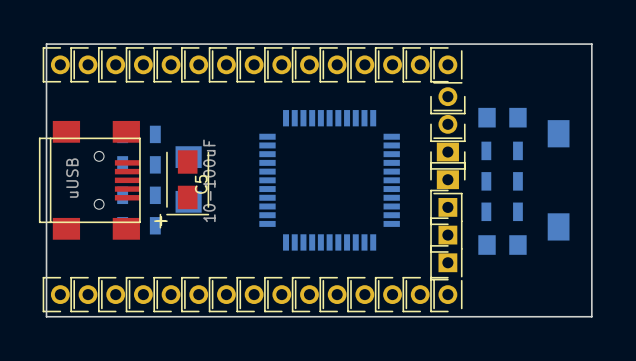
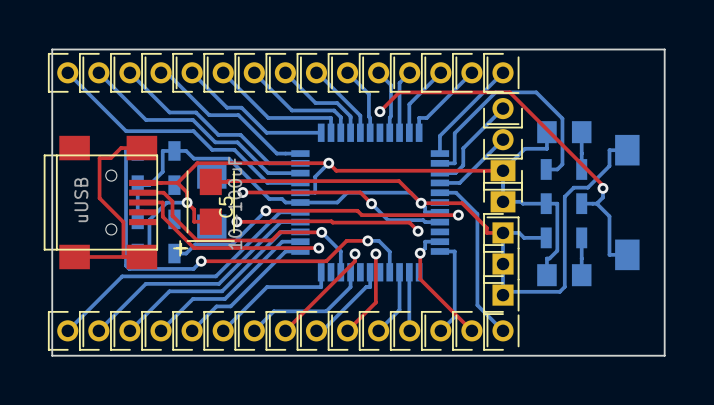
bottom track: none -> (67, 72) (126, 131) (193, 131) (212, 149) (234, 149) (267, 182) (300, 182)
bottom track: none -> (98, 72) (146, 119) (192, 119) (215, 142) (237, 142) (268, 173) (300, 173)
bottom track: none -> (129, 72) (169, 112) (196, 112) (218, 134) (240, 134) (269, 163) (300, 163)
bottom track: none -> (161, 72) (166, 72) (209, 115) (238, 115) (276, 153) (300, 153)
bottom track: none -> (192, 72) (227, 107) (241, 107) (266, 132) (321, 132)
bottom track: none -> (223, 72) (268, 117) (331, 117) (331, 132)
bottom track: none -> (254, 72) (292, 110) (334, 110) (340, 117) (340, 132)
bottom track: none -> (285, 72) (315, 103) (337, 103) (350, 116) (350, 132)
bottom track: none -> (316, 72) (360, 115) (360, 132)
bottom track: none -> (347, 72) (368, 94) (370, 132)
bottom track: none -> (378, 72) (391, 85) (389, 132)
bottom track: none -> (409, 72) (399, 83) (399, 132)
bottom track: none -> (440, 72) (409, 104) (409, 132)
bottom track: none -> (471, 72) (426, 117) (419, 117) (419, 132)
bottom track: none -> (503, 72) (439, 135) (439, 153)
bottom track: none -> (503, 108) (463, 148) (463, 165) (455, 173) (439, 173)
top track: none -> (379, 111) (399, 92) (509, 92) (602, 185) (602, 188)
via: none -> (379, 111)
bottom track: none -> (546, 132) (546, 148) (524, 148) (503, 170) (503, 201) (557, 203) (557, 250) (549, 258) (546, 258) (546, 275)
bottom track: none -> (581, 132) (581, 169)
bottom track: none -> (503, 139) (459, 182) (439, 182)
top track: none -> (141, 148) (121, 148) (110, 158) (99, 158) (99, 198) (123, 222) (123, 256)
bottom track: none -> (627, 150) (609, 150) (609, 166) (587, 187) (573, 187) (564, 196) (564, 286) (559, 291) (503, 291)
bottom track: none -> (137, 150) (126, 150) (126, 265) (129, 268) (193, 268) (201, 261)
bottom track: none -> (328, 163) (315, 176) (315, 192) (300, 192)
via: none -> (328, 163)
bottom track: none -> (439, 163) (454, 163) (454, 133) (495, 92) (536, 92) (562, 118) (562, 164) (557, 169) (546, 169)
top track: none -> (503, 170) (336, 170) (328, 163) (197, 163) (177, 182)
top track: none -> (143, 182) (177, 182)
top track: none -> (177, 182) (187, 192) (187, 202) (194, 209) (194, 221) (210, 221)
top track: none -> (210, 181) (399, 181) (421, 203) (462, 203) (486, 227) (486, 232) (503, 232)
bottom track: none -> (602, 188) (602, 197) (596, 203)
via: none -> (602, 188)
top track: none -> (143, 192) (163, 192) (172, 201) (172, 215) (197, 240) (271, 240) (279, 232) (321, 232)
top track: none -> (242, 192) (360, 192) (371, 203)
via: none -> (242, 192)
bottom track: none -> (439, 192) (456, 192) (477, 214) (477, 305) (503, 330)
top track: none -> (143, 202) (162, 202) (162, 216) (194, 248) (318, 248)
bottom track: none -> (187, 202) (166, 202) (149, 220) (149, 253) (137, 253)
via: none -> (187, 202)
via: none -> (421, 203)
bottom track: none -> (371, 203) (387, 220) (439, 222)
via: none -> (371, 203)
bottom track: none -> (581, 203) (596, 203)
bottom track: none -> (596, 203) (609, 216) (609, 254) (627, 254)
bottom track: none -> (265, 210) (232, 244) (195, 244) (186, 253) (174, 253)
top track: none -> (265, 210) (357, 210) (361, 215) (458, 215)
via: none -> (265, 210)
bottom track: none -> (300, 212) (279, 212) (215, 276) (122, 276) (67, 330)
bottom track: none -> (439, 212) (425, 212) (425, 207) (410, 192) (347, 192) (337, 202) (285, 202) (282, 198) (269, 198) (228, 158) (193, 158) (186, 150) (162, 150) (162, 171) (149, 185) (137, 185) (137, 219)
via: none -> (458, 215)
top track: none -> (236, 221) (409, 222) (418, 231)
via: none -> (236, 221)
bottom track: none -> (300, 222) (280, 222) (218, 283) (145, 283) (98, 330)
via: none -> (418, 231)
bottom track: none -> (300, 231) (281, 231) (222, 291) (169, 291) (129, 330)
bottom track: none -> (321, 232) (340, 251) (340, 272)
via: none -> (321, 232)
bottom track: none -> (546, 237) (524, 237) (519, 232) (503, 232) (503, 295)
bottom track: none -> (367, 240) (378, 240) (389, 251) (389, 272)
top track: none -> (367, 240) (346, 240) (326, 261) (201, 261)
via: none -> (367, 240)
bottom track: none -> (300, 241) (282, 241) (224, 298) (192, 298) (161, 330)
bottom track: none -> (439, 241) (425, 241) (425, 248) (420, 253)
via: none -> (318, 248)
bottom track: none -> (300, 251) (285, 251) (230, 306) (216, 306) (192, 330)
bottom track: none -> (439, 251) (454, 251) (454, 316) (440, 330)
top track: none -> (420, 253) (420, 279) (471, 330)
via: none -> (420, 253)
top track: none -> (355, 253) (355, 261) (285, 330)
via: none -> (355, 253)
top track: none -> (375, 253) (375, 302) (347, 330)
via: none -> (375, 253)
top track: none -> (74, 256) (141, 256)
via: none -> (201, 261)
bottom track: none -> (321, 272) (321, 287) (267, 287) (223, 330)
bottom track: none -> (350, 272) (350, 287) (326, 311) (273, 311) (254, 330)
bottom track: none -> (370, 272) (370, 287) (366, 287) (322, 330) (316, 330)
bottom track: none -> (399, 272) (399, 309) (378, 330)
bottom track: none -> (409, 272) (409, 330)

